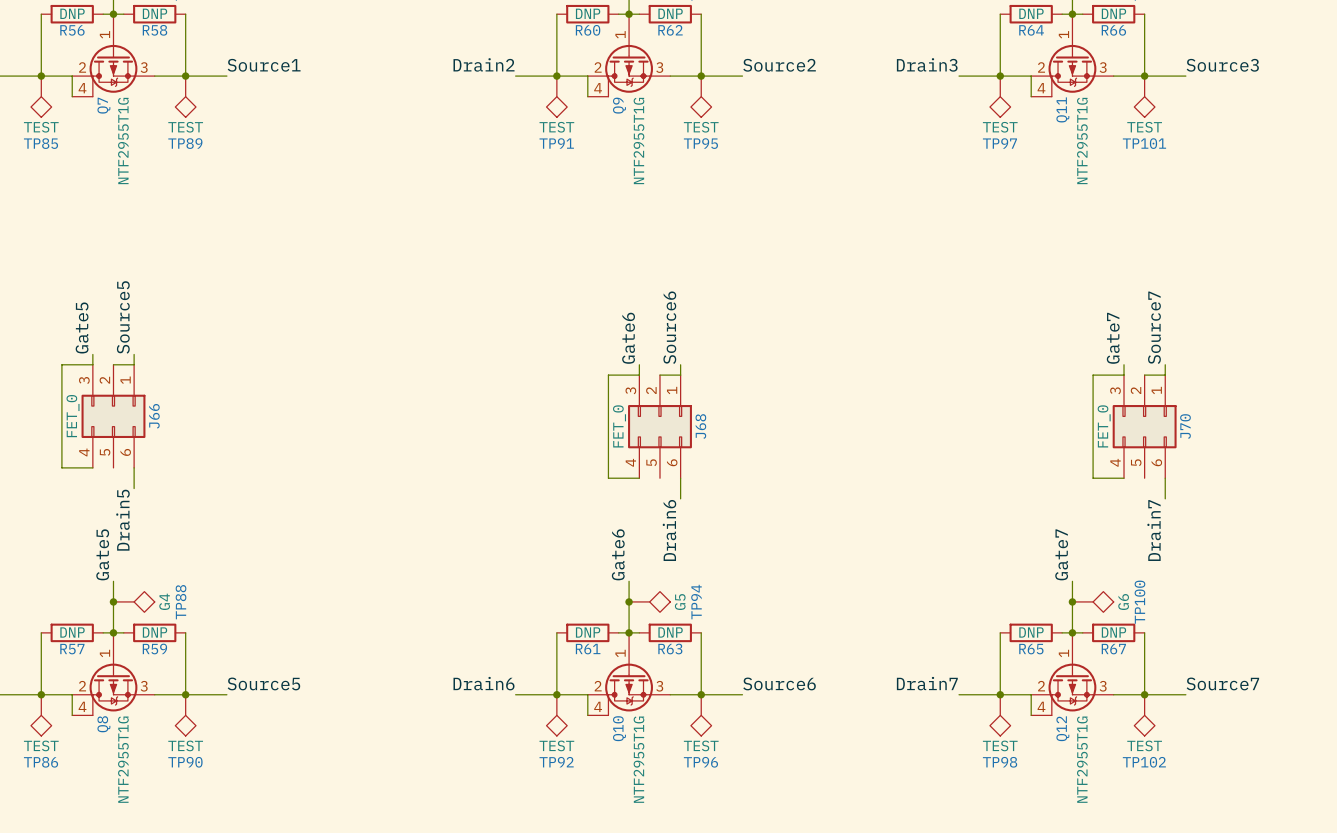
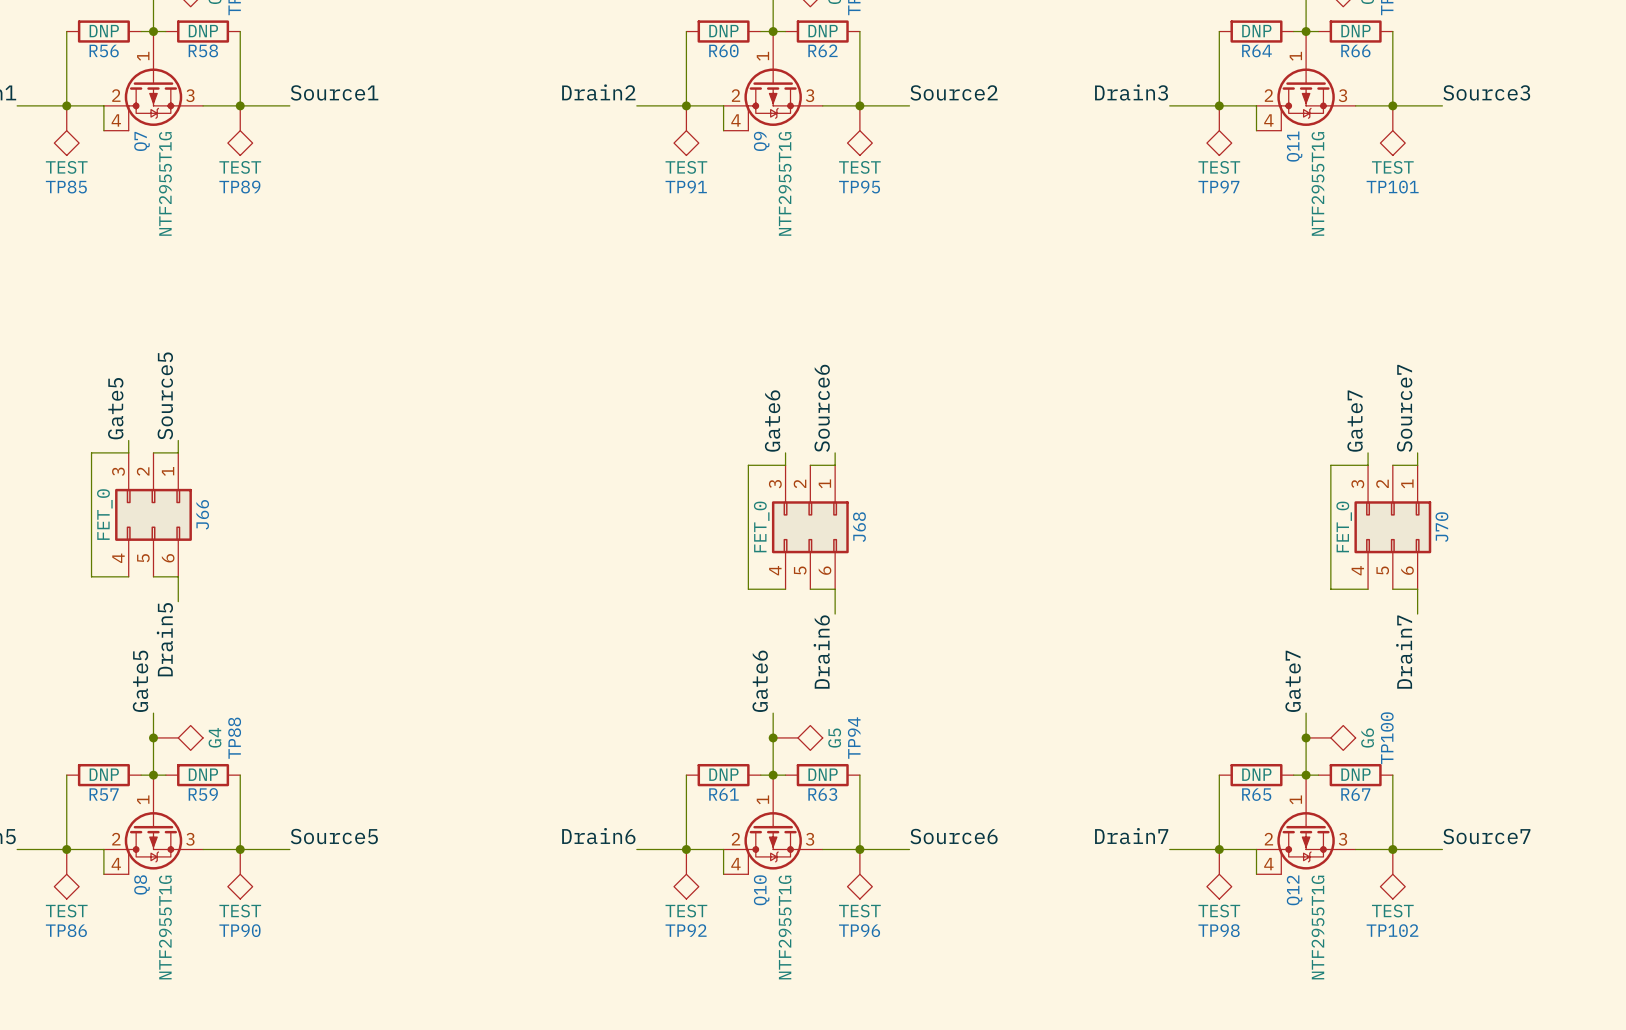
wire: none -> (153, 576) (178, 576)
wire: none -> (810, 589) (835, 589)
wire: none -> (1392, 589) (1417, 589)

